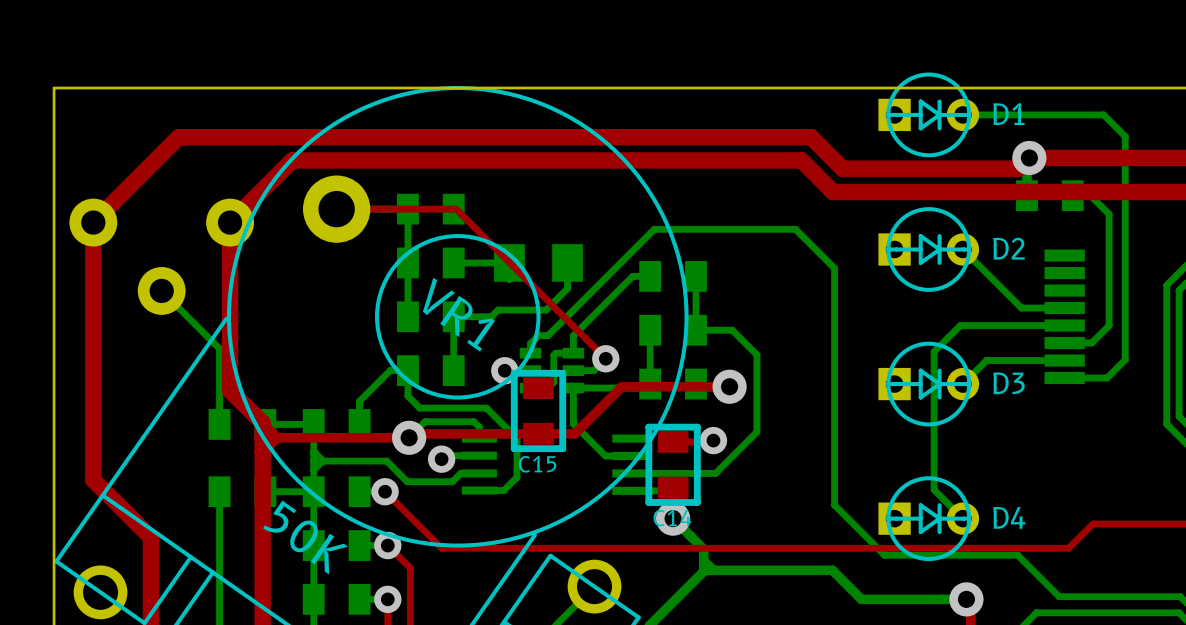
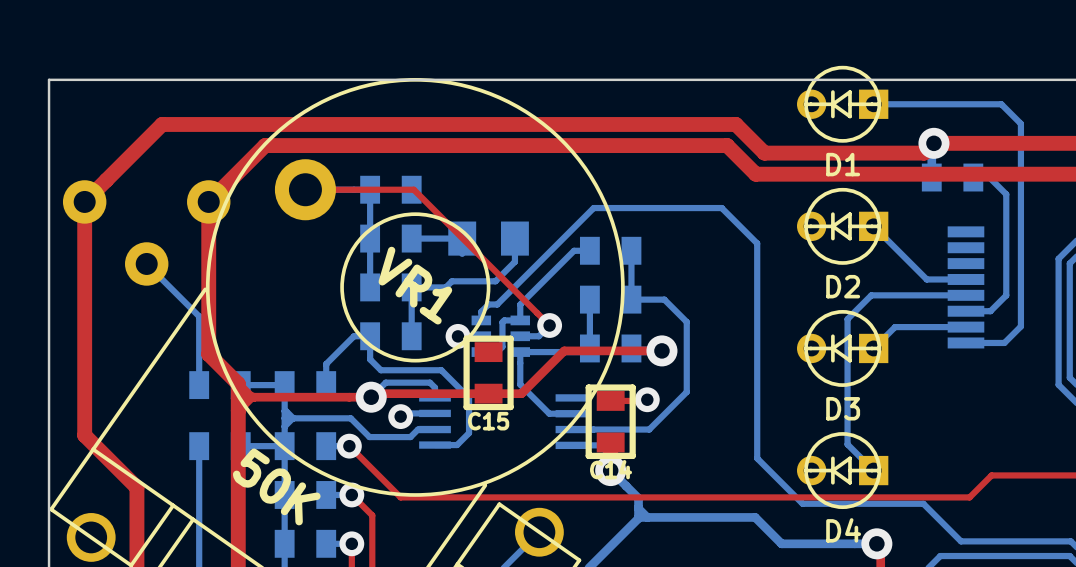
D1 rotation: 0° (928, 114) -> 180° (842, 104)
D1 name position: D1 (1008, 114) -> D1 (843, 164)
D2 name position: D2 (1008, 248) -> D2 (843, 286)
D2 rotation: 0° (928, 249) -> 180° (842, 226)
D3 name position: D3 (1008, 383) -> D3 (843, 408)
D3 rotation: 0° (928, 384) -> 180° (842, 348)
D4 name position: D4 (1009, 517) -> D4 (843, 530)
D4 rotation: 0° (928, 518) -> 180° (842, 470)

